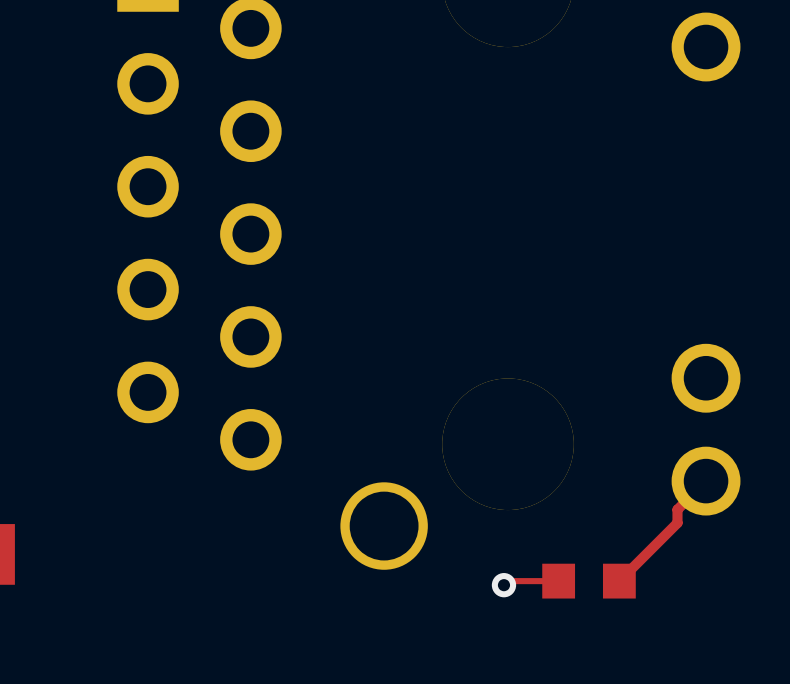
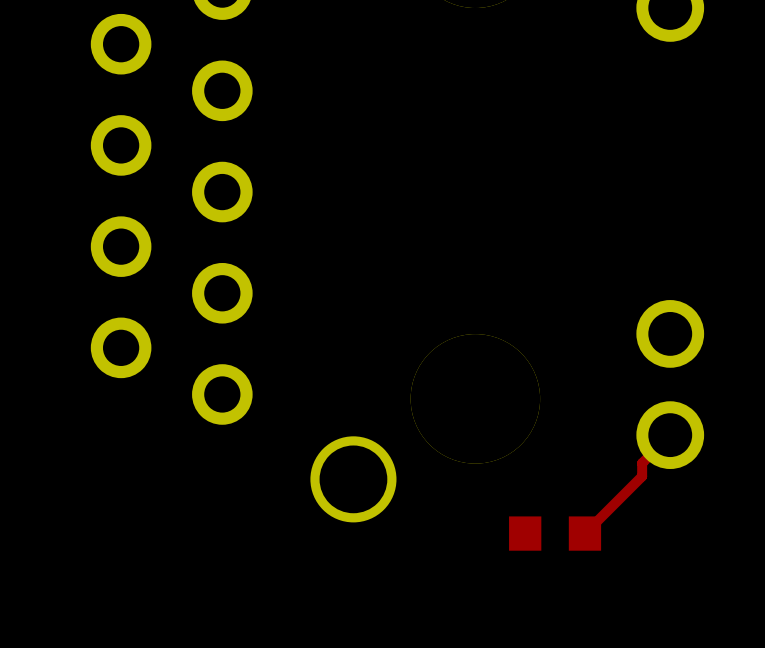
top track: (558, 581) (508, 581) (503, 585) -> none
via: (503, 585) -> none

